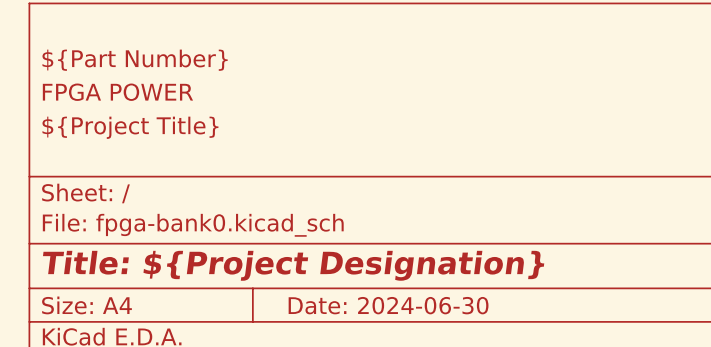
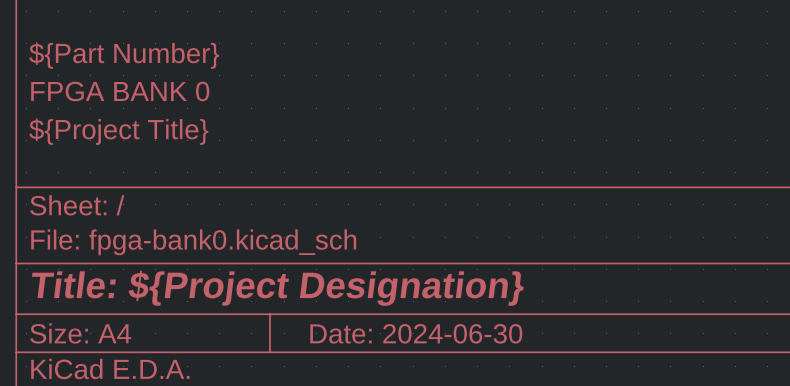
title block: FPGA POWER (117, 92) -> FPGA BANK 0 (120, 91)

